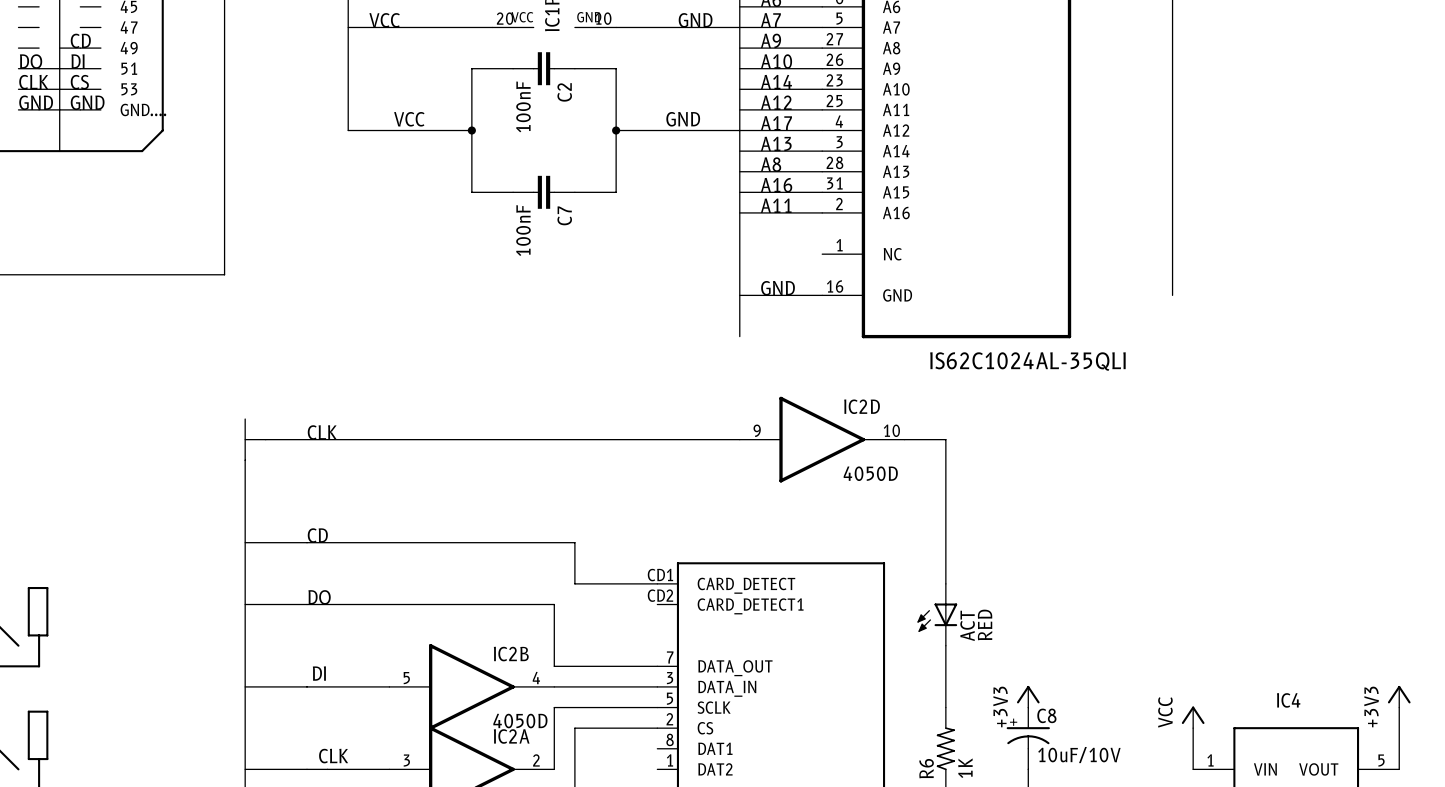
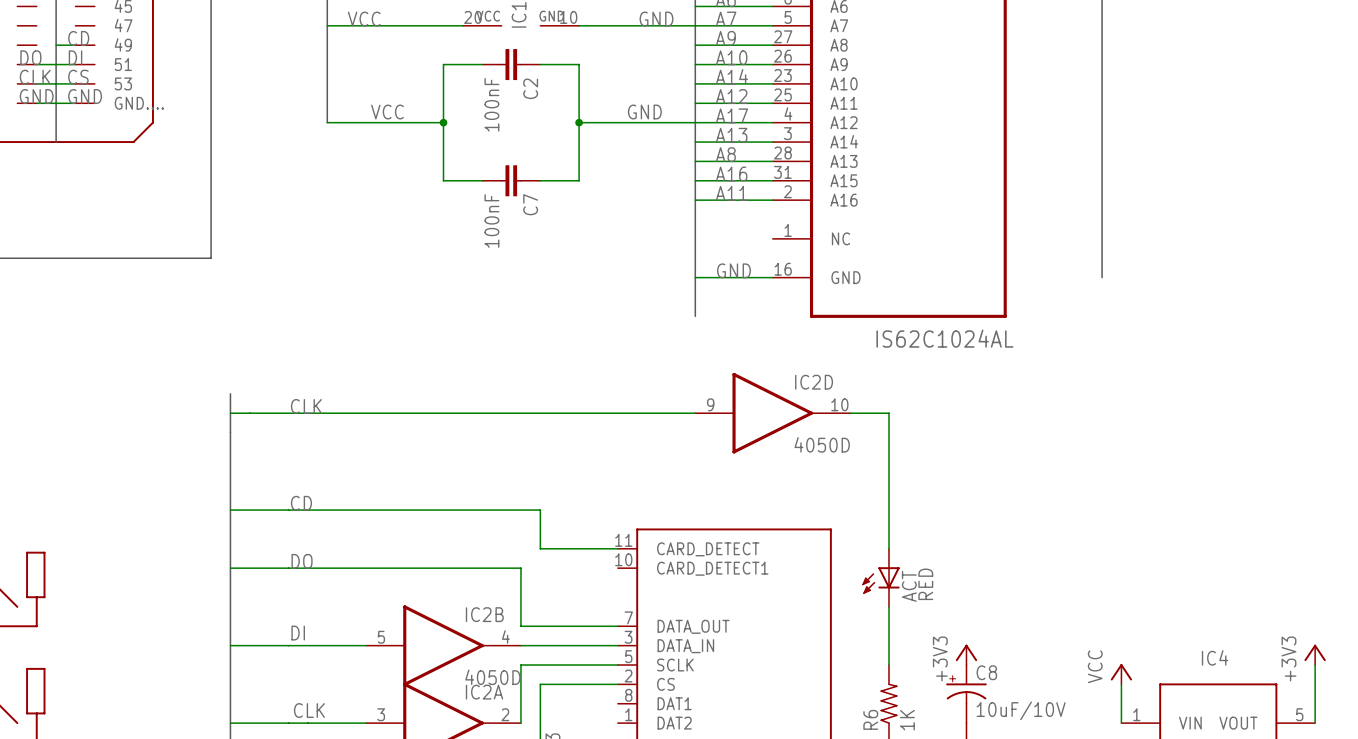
part value: IS62C1024AL-35QLI (1027, 361) -> IS62C1024AL (944, 338)
part pin number: CD1 (660, 575) -> 11 (623, 540)
part pin number: CD2 (660, 595) -> 10 (623, 559)

